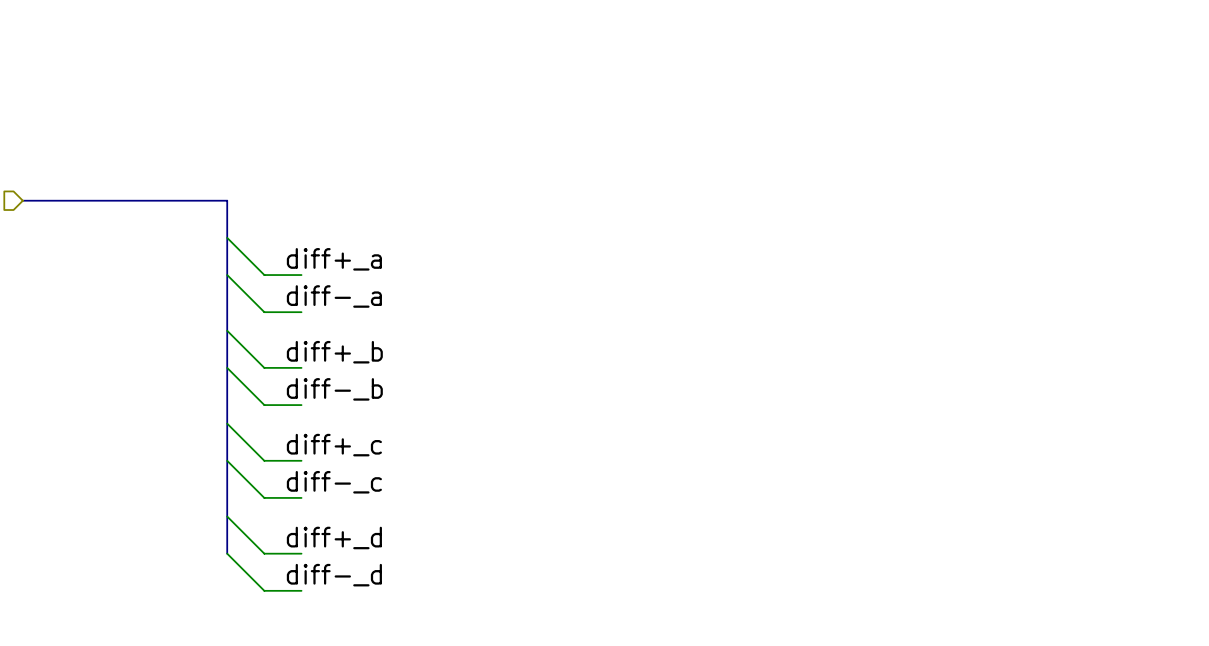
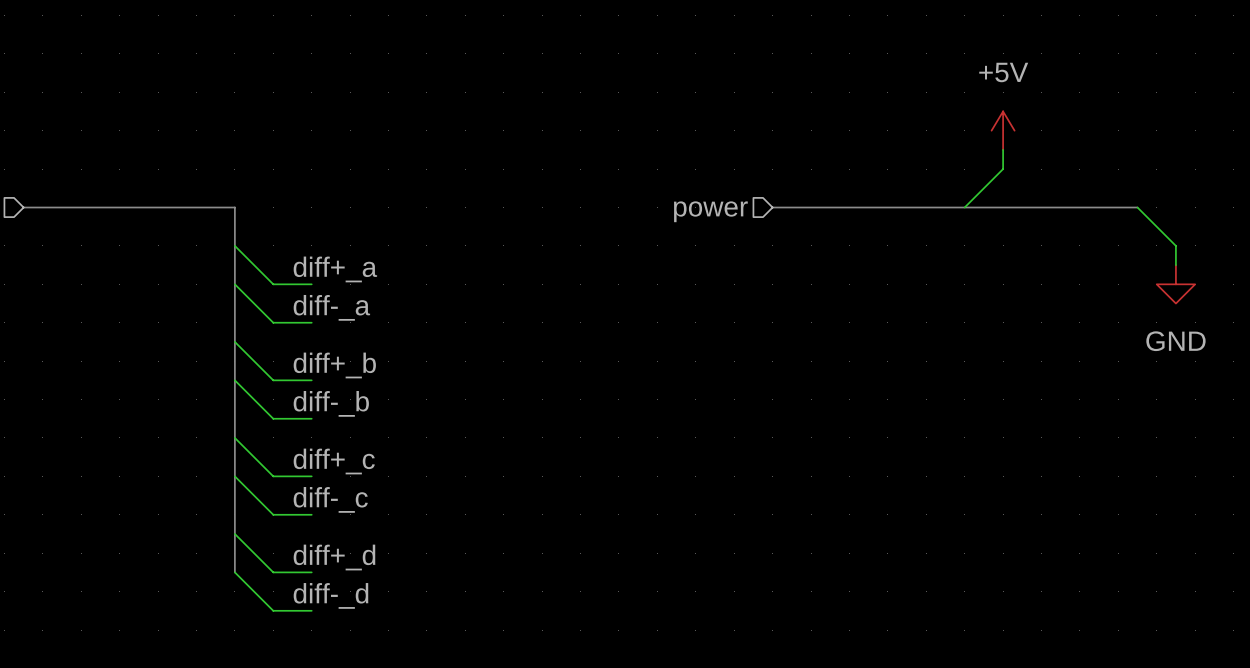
power symbol: none -> +5V (1003, 130)
wire: none -> (1003, 149) (1003, 169) (964, 207)
bus: none -> (772, 207) (1137, 207)
wire: none -> (1137, 207) (1175, 245) (1175, 265)
hierarchical label: none -> power (710, 211)
power symbol: none -> GND (1175, 284)

